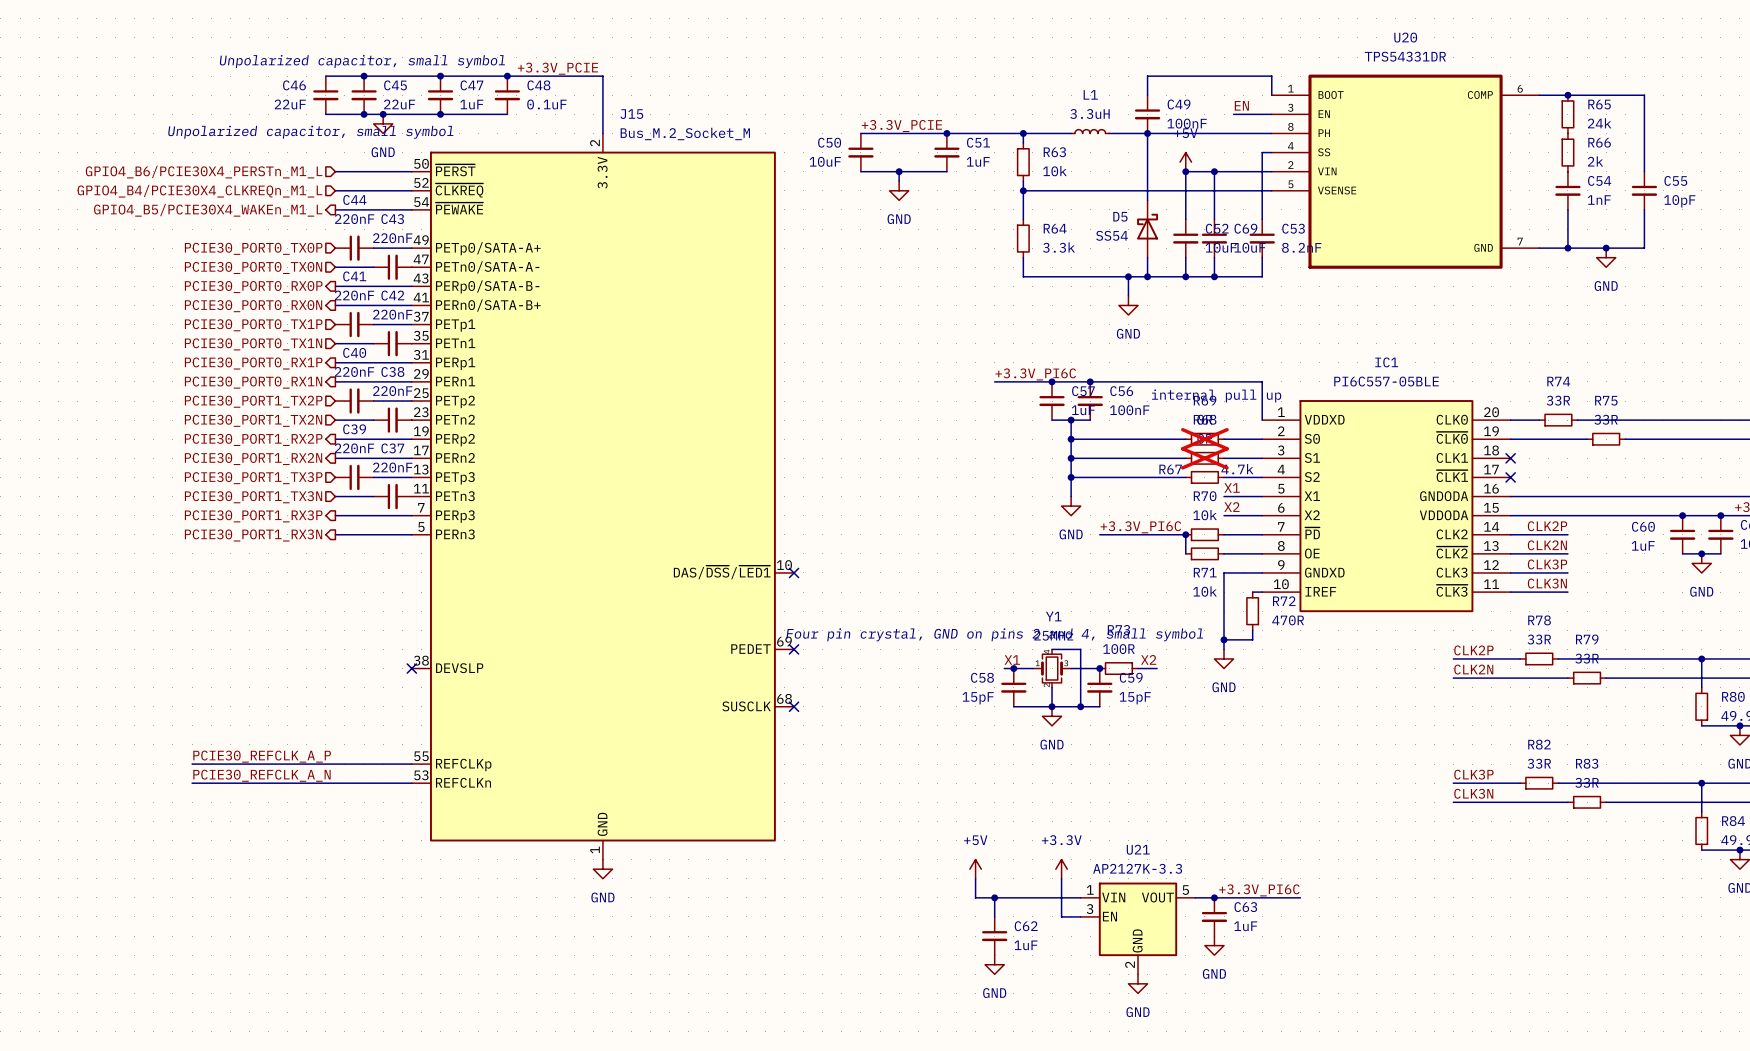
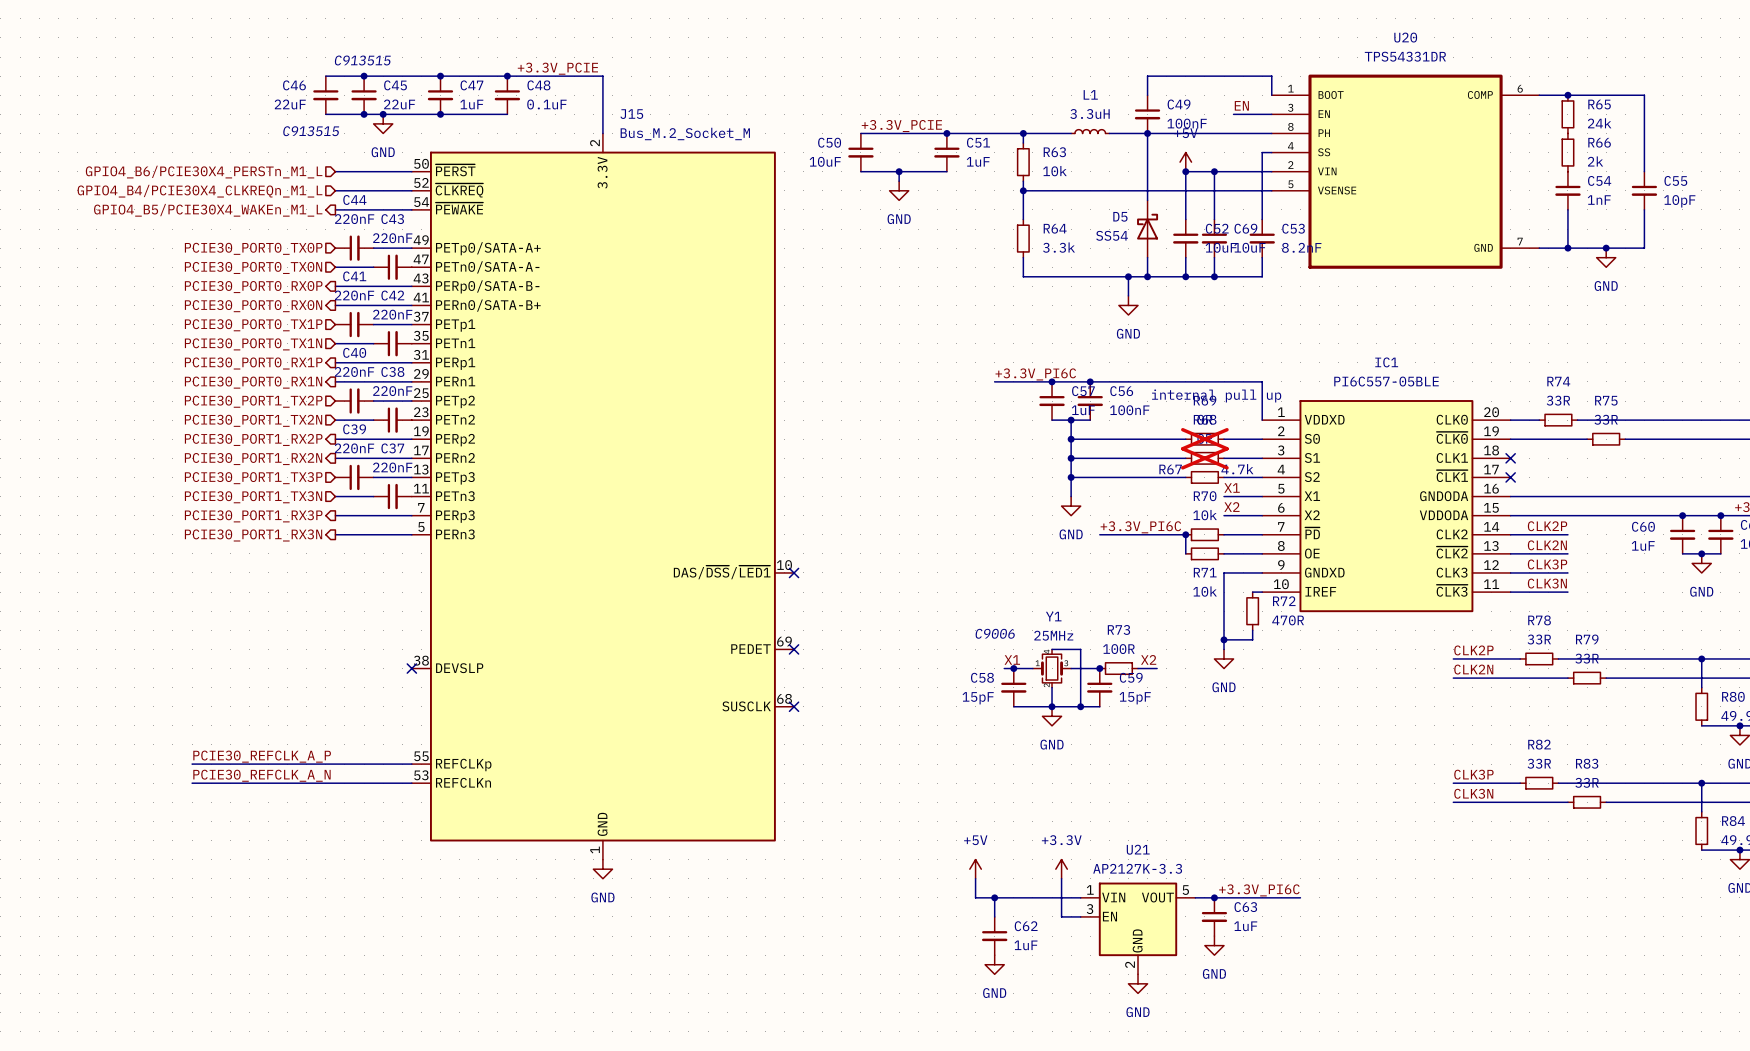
C45 text: Unpolarized capacitor, small symbol (362, 61) -> C913515 (362, 60)
C46 text: Unpolarized capacitor, small symbol (310, 132) -> C913515 (311, 131)
Y1 text: Four pin crystal, GND on pins 2 and 4, small symbol (994, 634) -> C9006 (995, 633)

